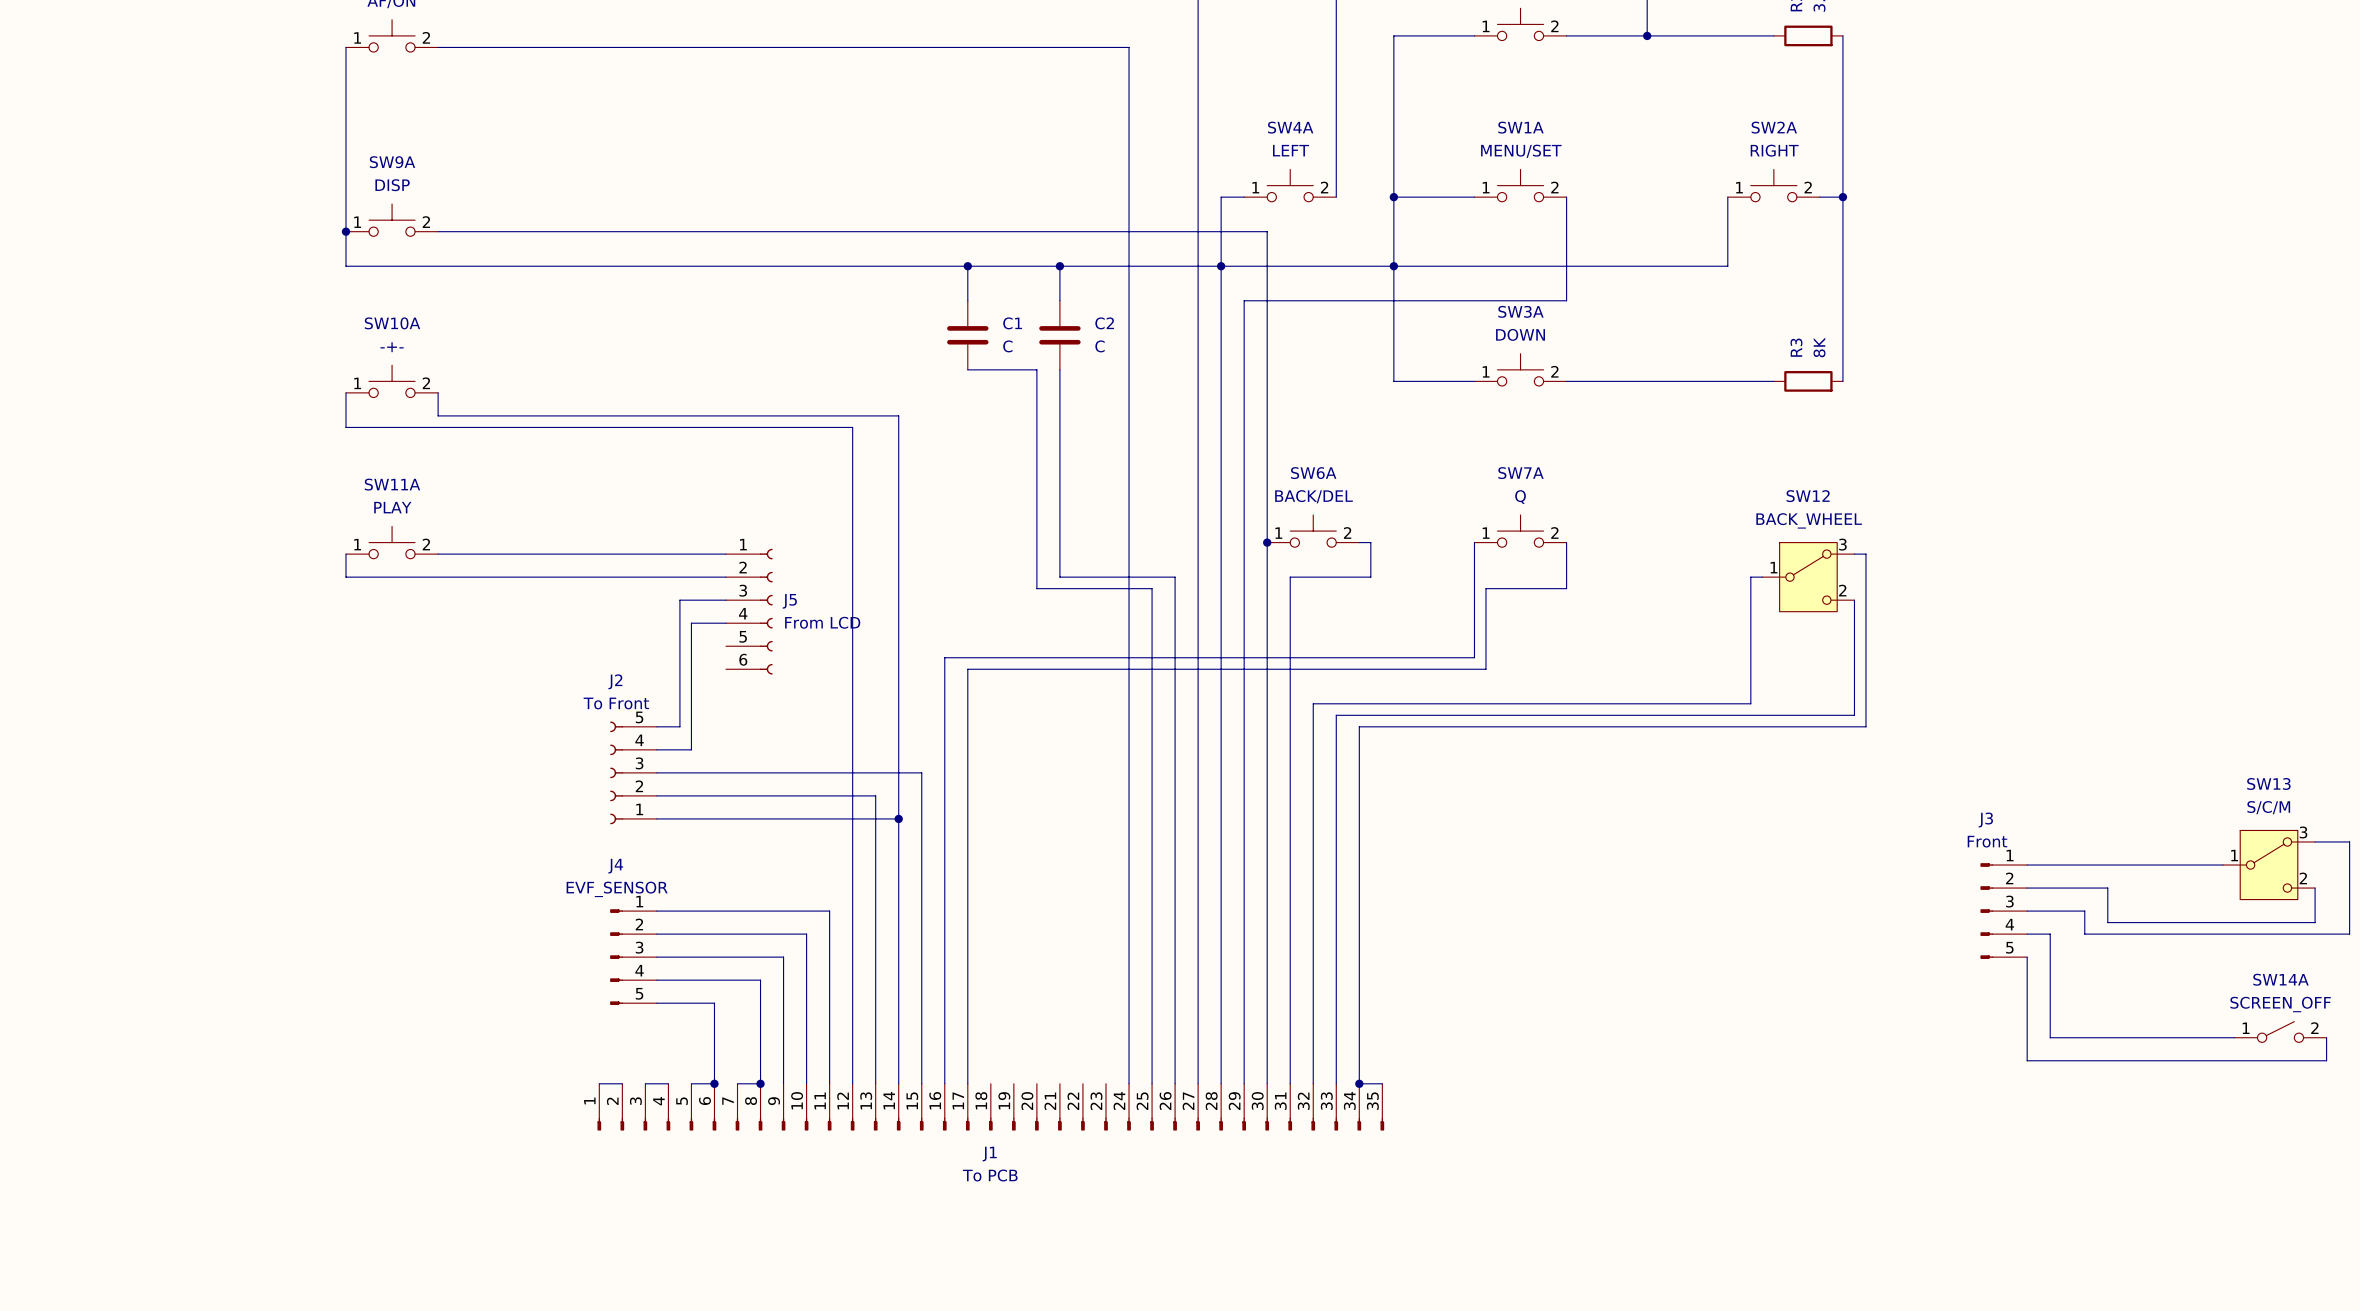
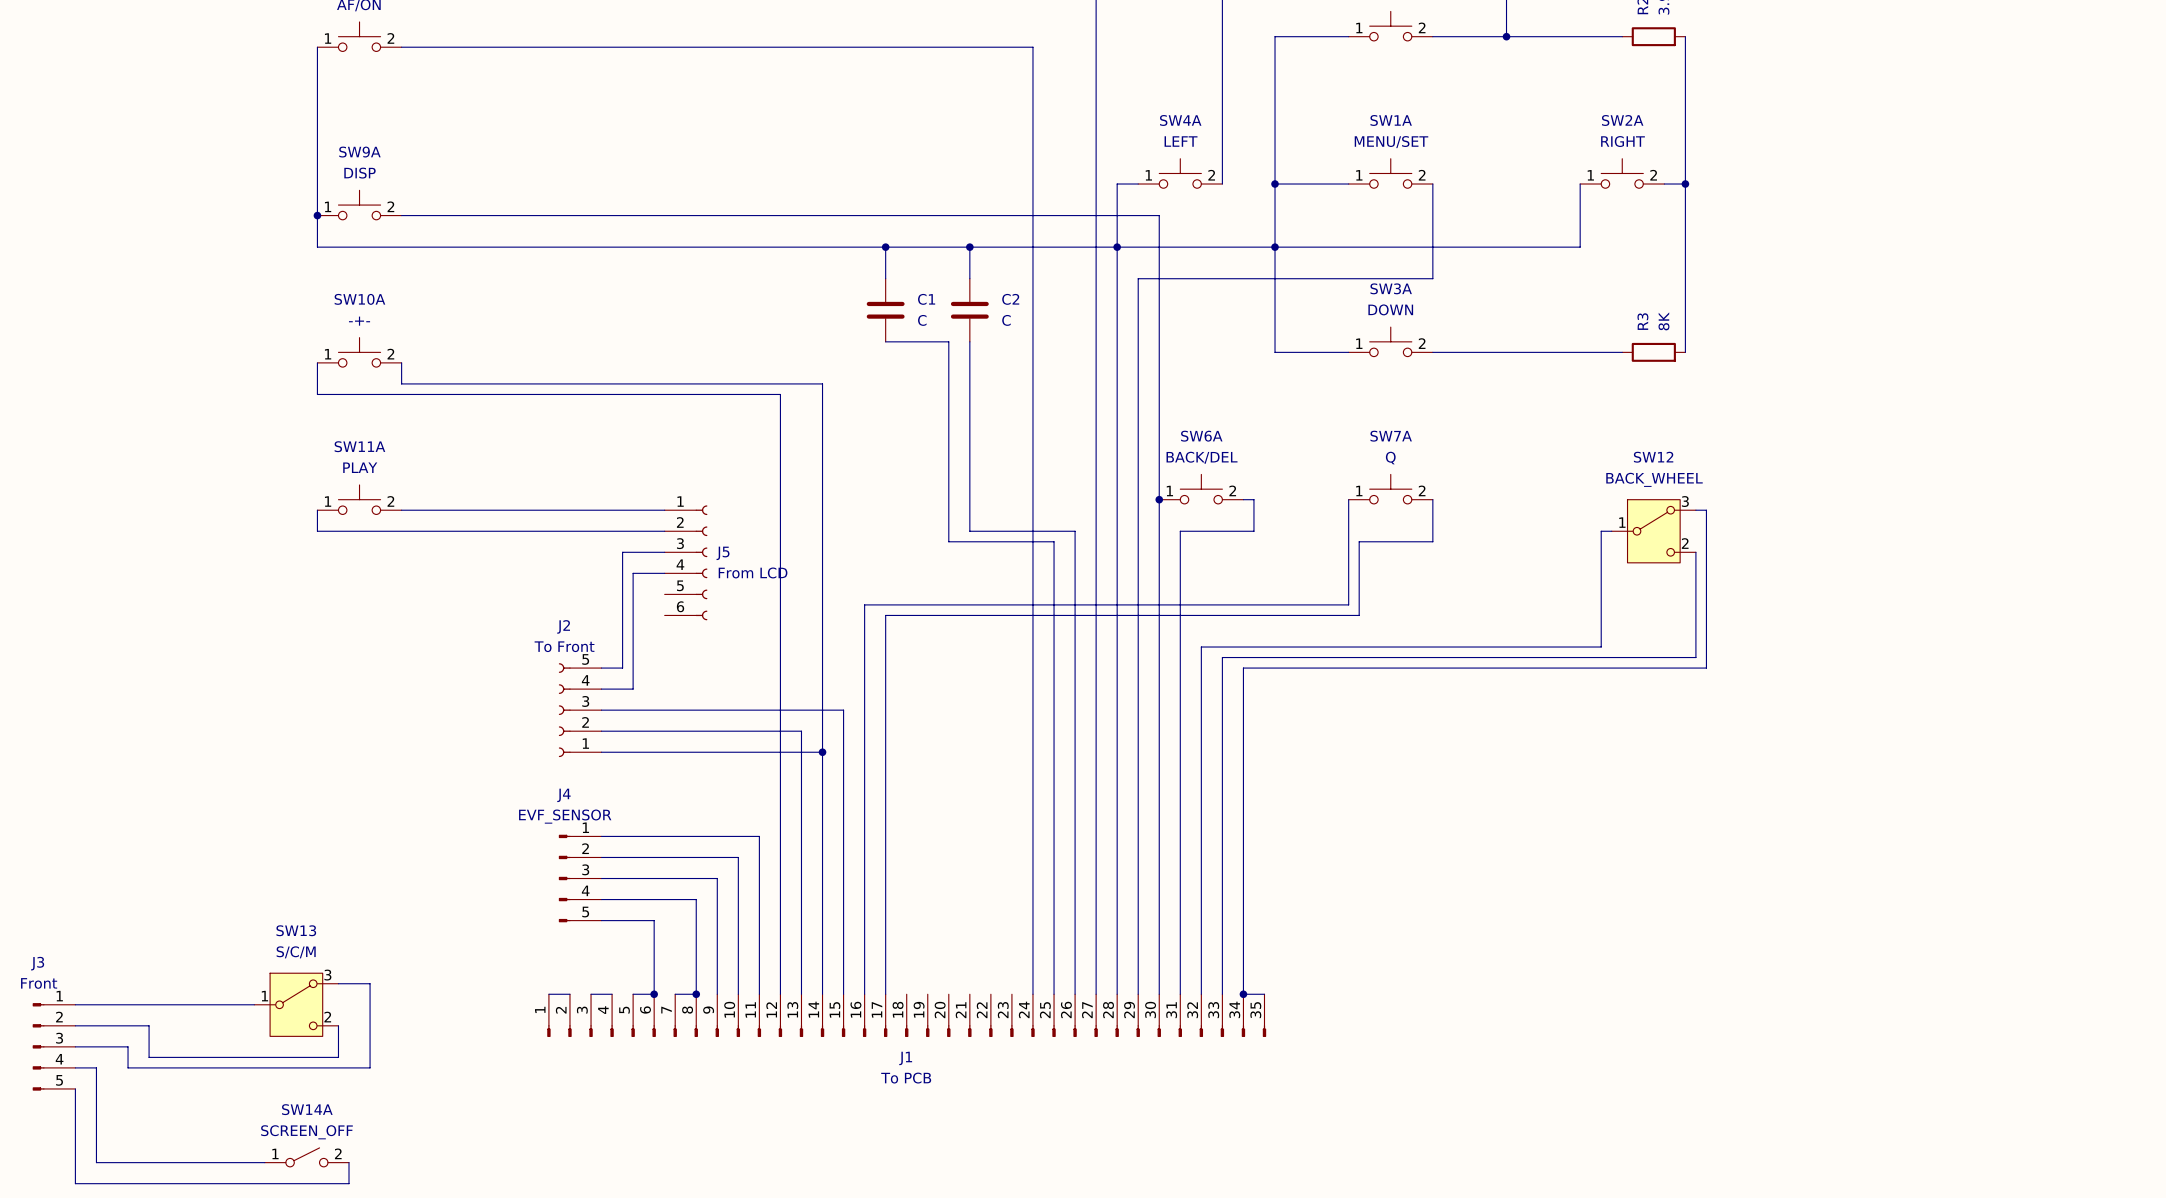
wire: (2315, 841) (2349, 841) (2349, 934) (2084, 934) (2084, 911) (2027, 911) -> none
wire: (2027, 865) (2222, 865) -> none
SW13 position: (2269, 865) -> (296, 1004)
wire: (2027, 888) (2107, 888) (2107, 922) (2315, 922) (2315, 888) -> none
J3 position: (2003, 911) -> (54, 1046)
wire: (2027, 934) (2050, 934) (2050, 1037) (2234, 1037) -> none
wire: (2027, 957) (2027, 1060) (2326, 1060) (2326, 1037) -> none
SW14A position: (2280, 1031) -> (306, 1157)
wire: none -> (338, 983) (370, 983) (370, 1067) (128, 1067) (128, 1046) (75, 1046)
wire: none -> (75, 1004) (254, 1004)
wire: none -> (75, 1025) (149, 1025) (149, 1057) (338, 1057) (338, 1025)
wire: none -> (75, 1067) (96, 1067) (96, 1162) (264, 1162)
wire: none -> (75, 1088) (75, 1183) (349, 1183) (349, 1162)

